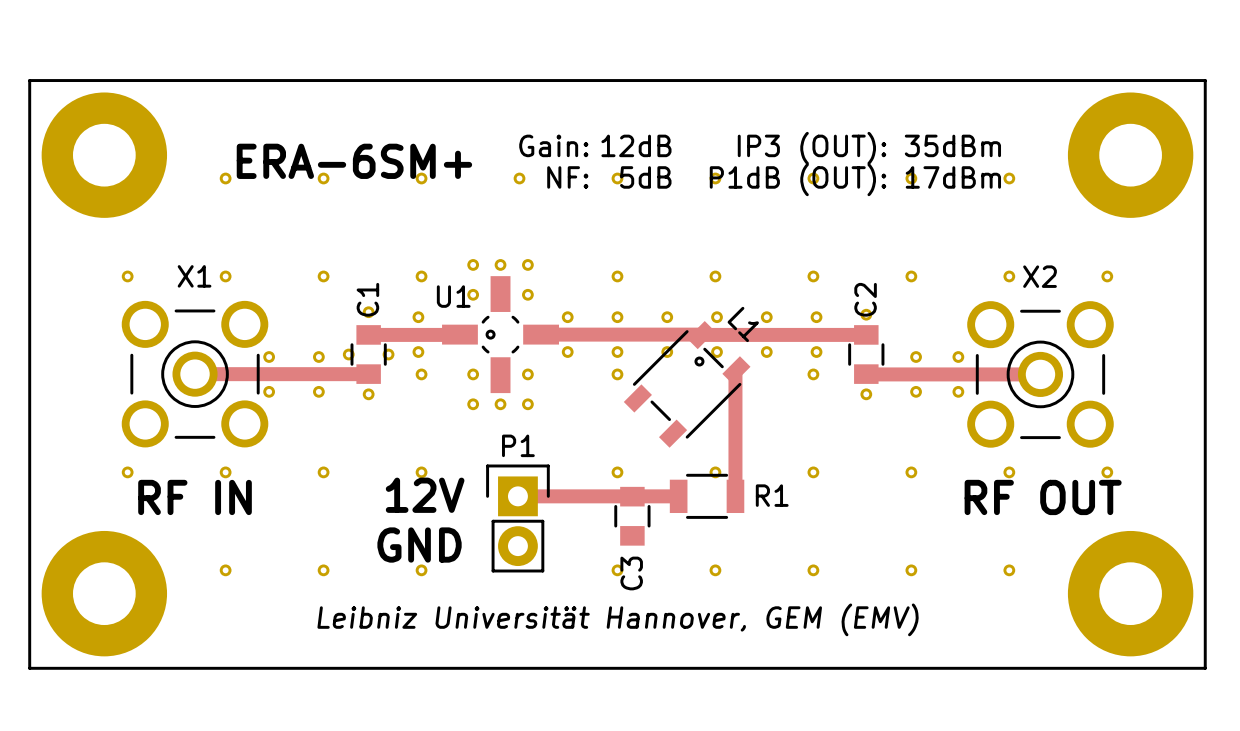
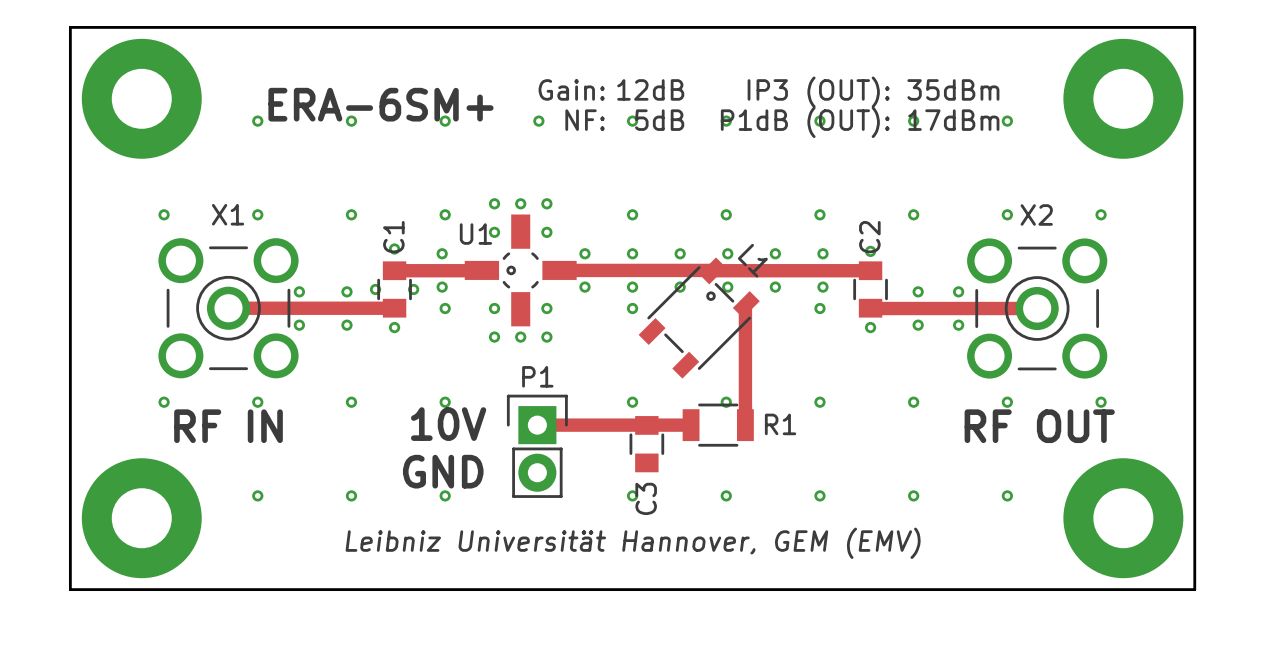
text: 12V (425, 495) -> 10V (448, 424)

